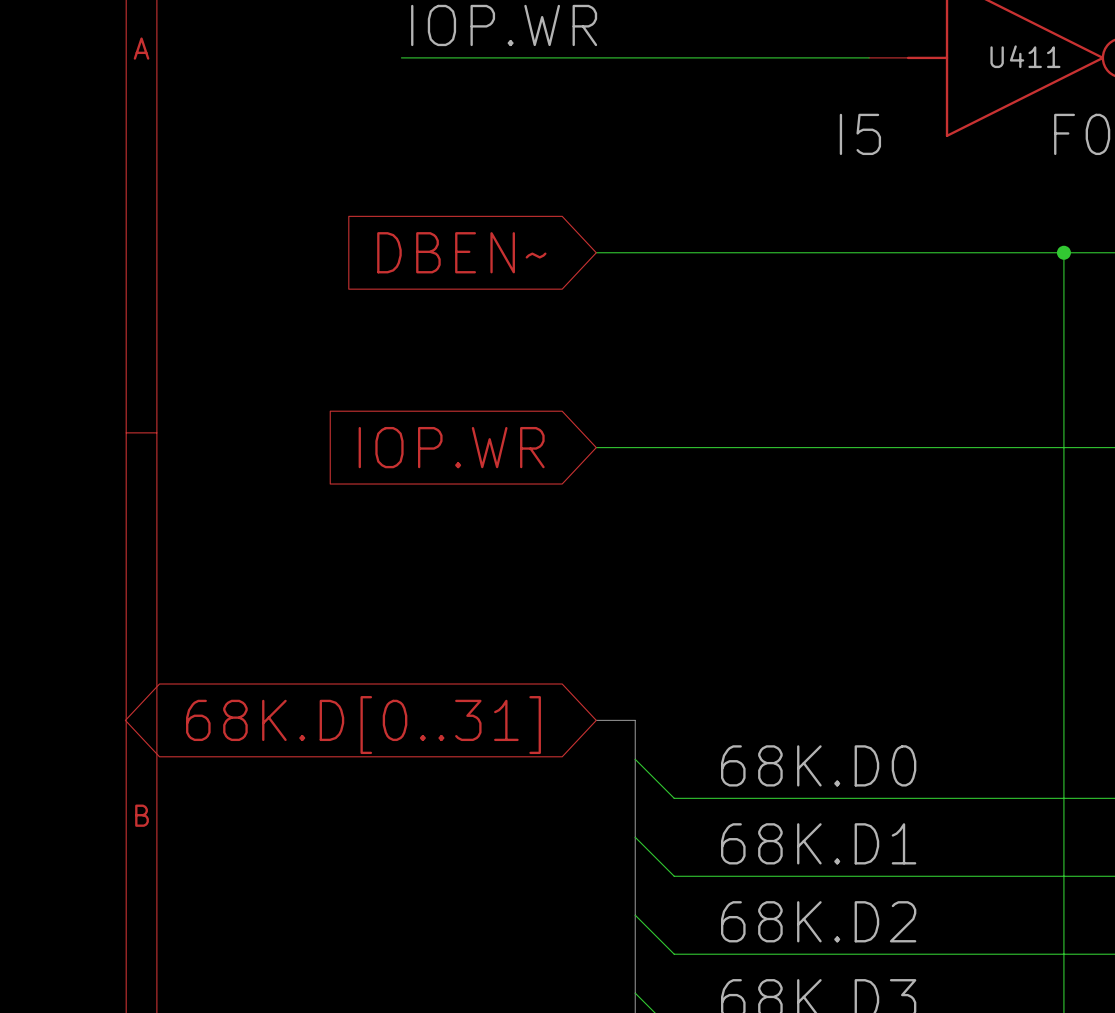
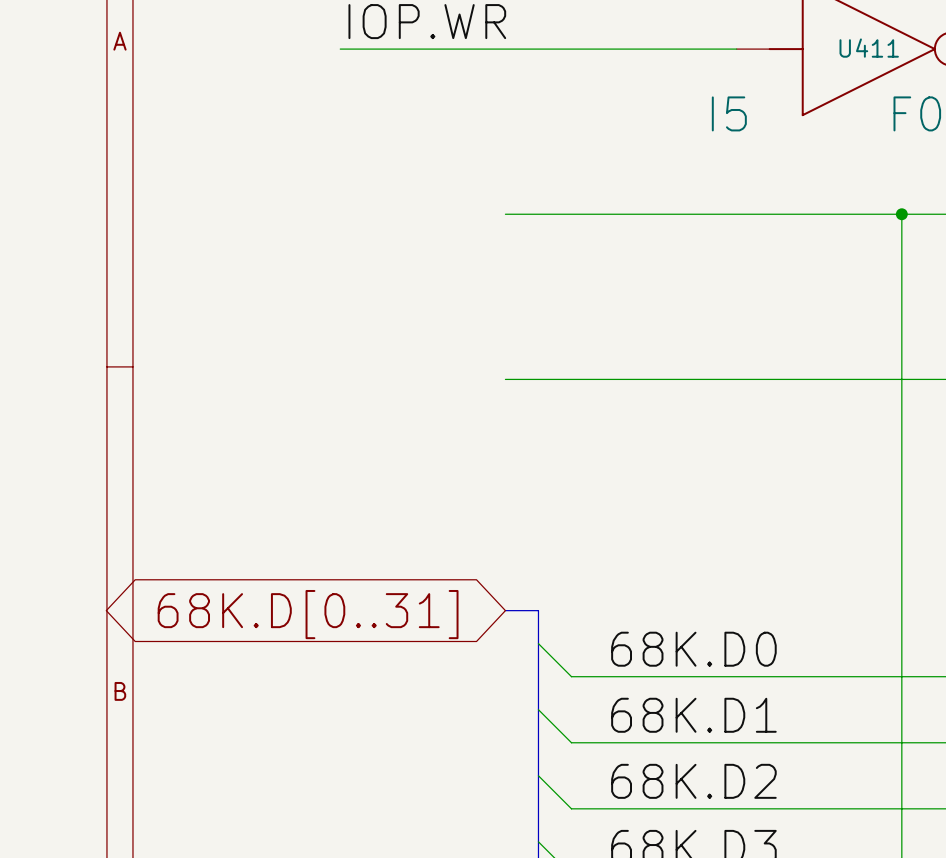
global label: DBEN~ (461, 252) -> none
global label: IOP.WR (451, 447) -> none

